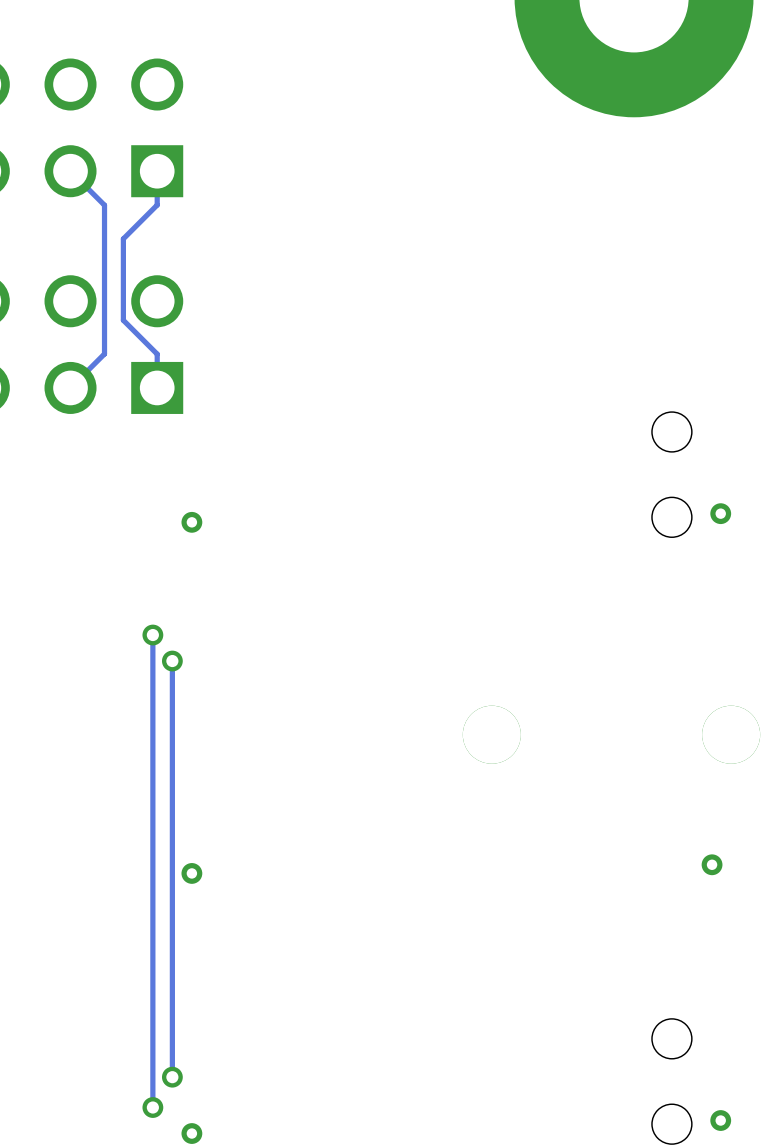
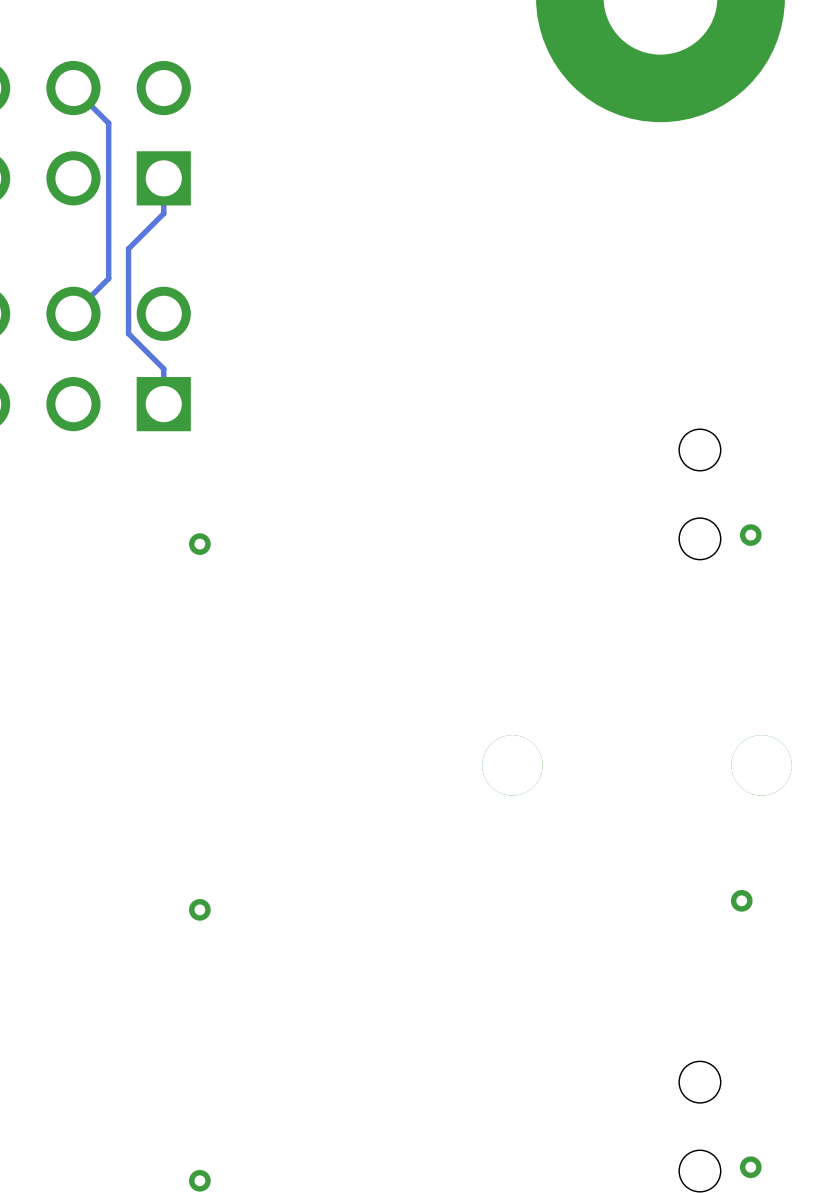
track: (70, 171) (104, 205) (104, 353) (70, 387) -> (73, 88) (108, 123) (108, 278) (73, 313)
track: (152, 635) (152, 1107) -> none
via: (152, 635) -> none
track: (172, 661) (172, 1077) -> none
via: (172, 661) -> none
via: (172, 1077) -> none
via: (152, 1107) -> none

